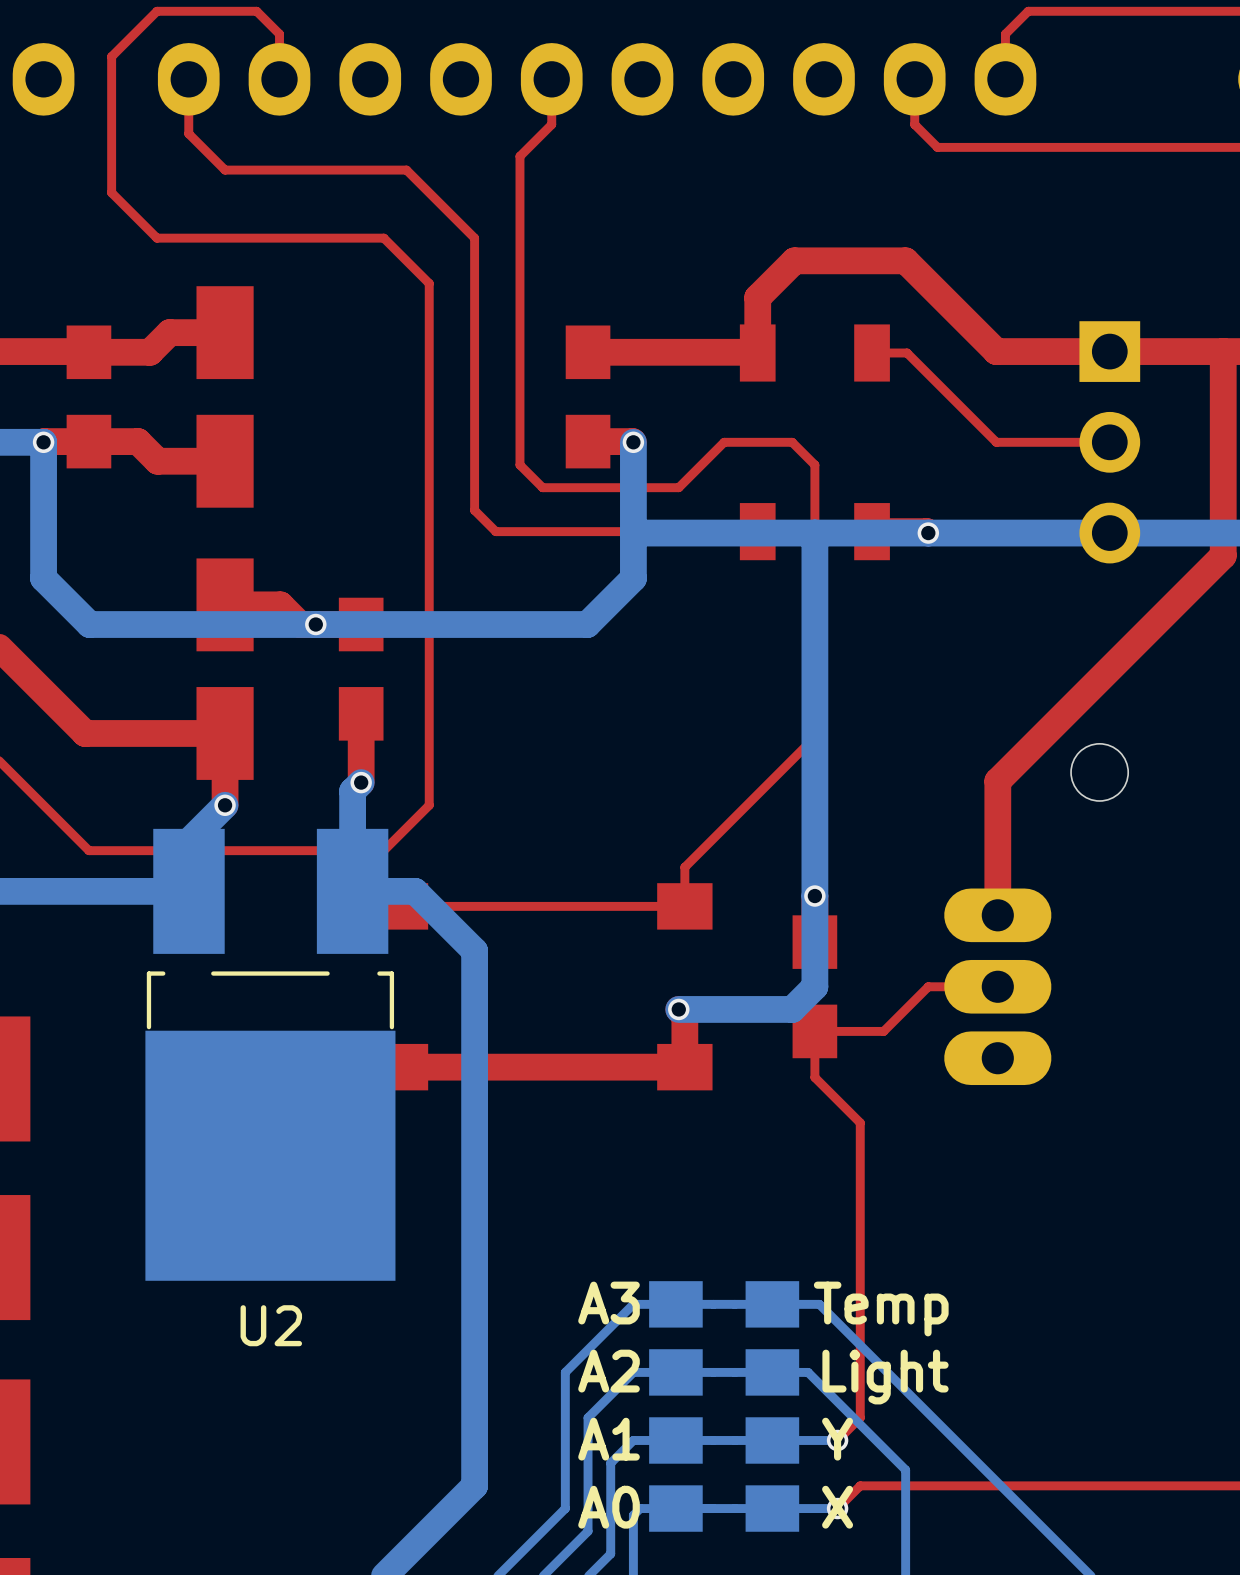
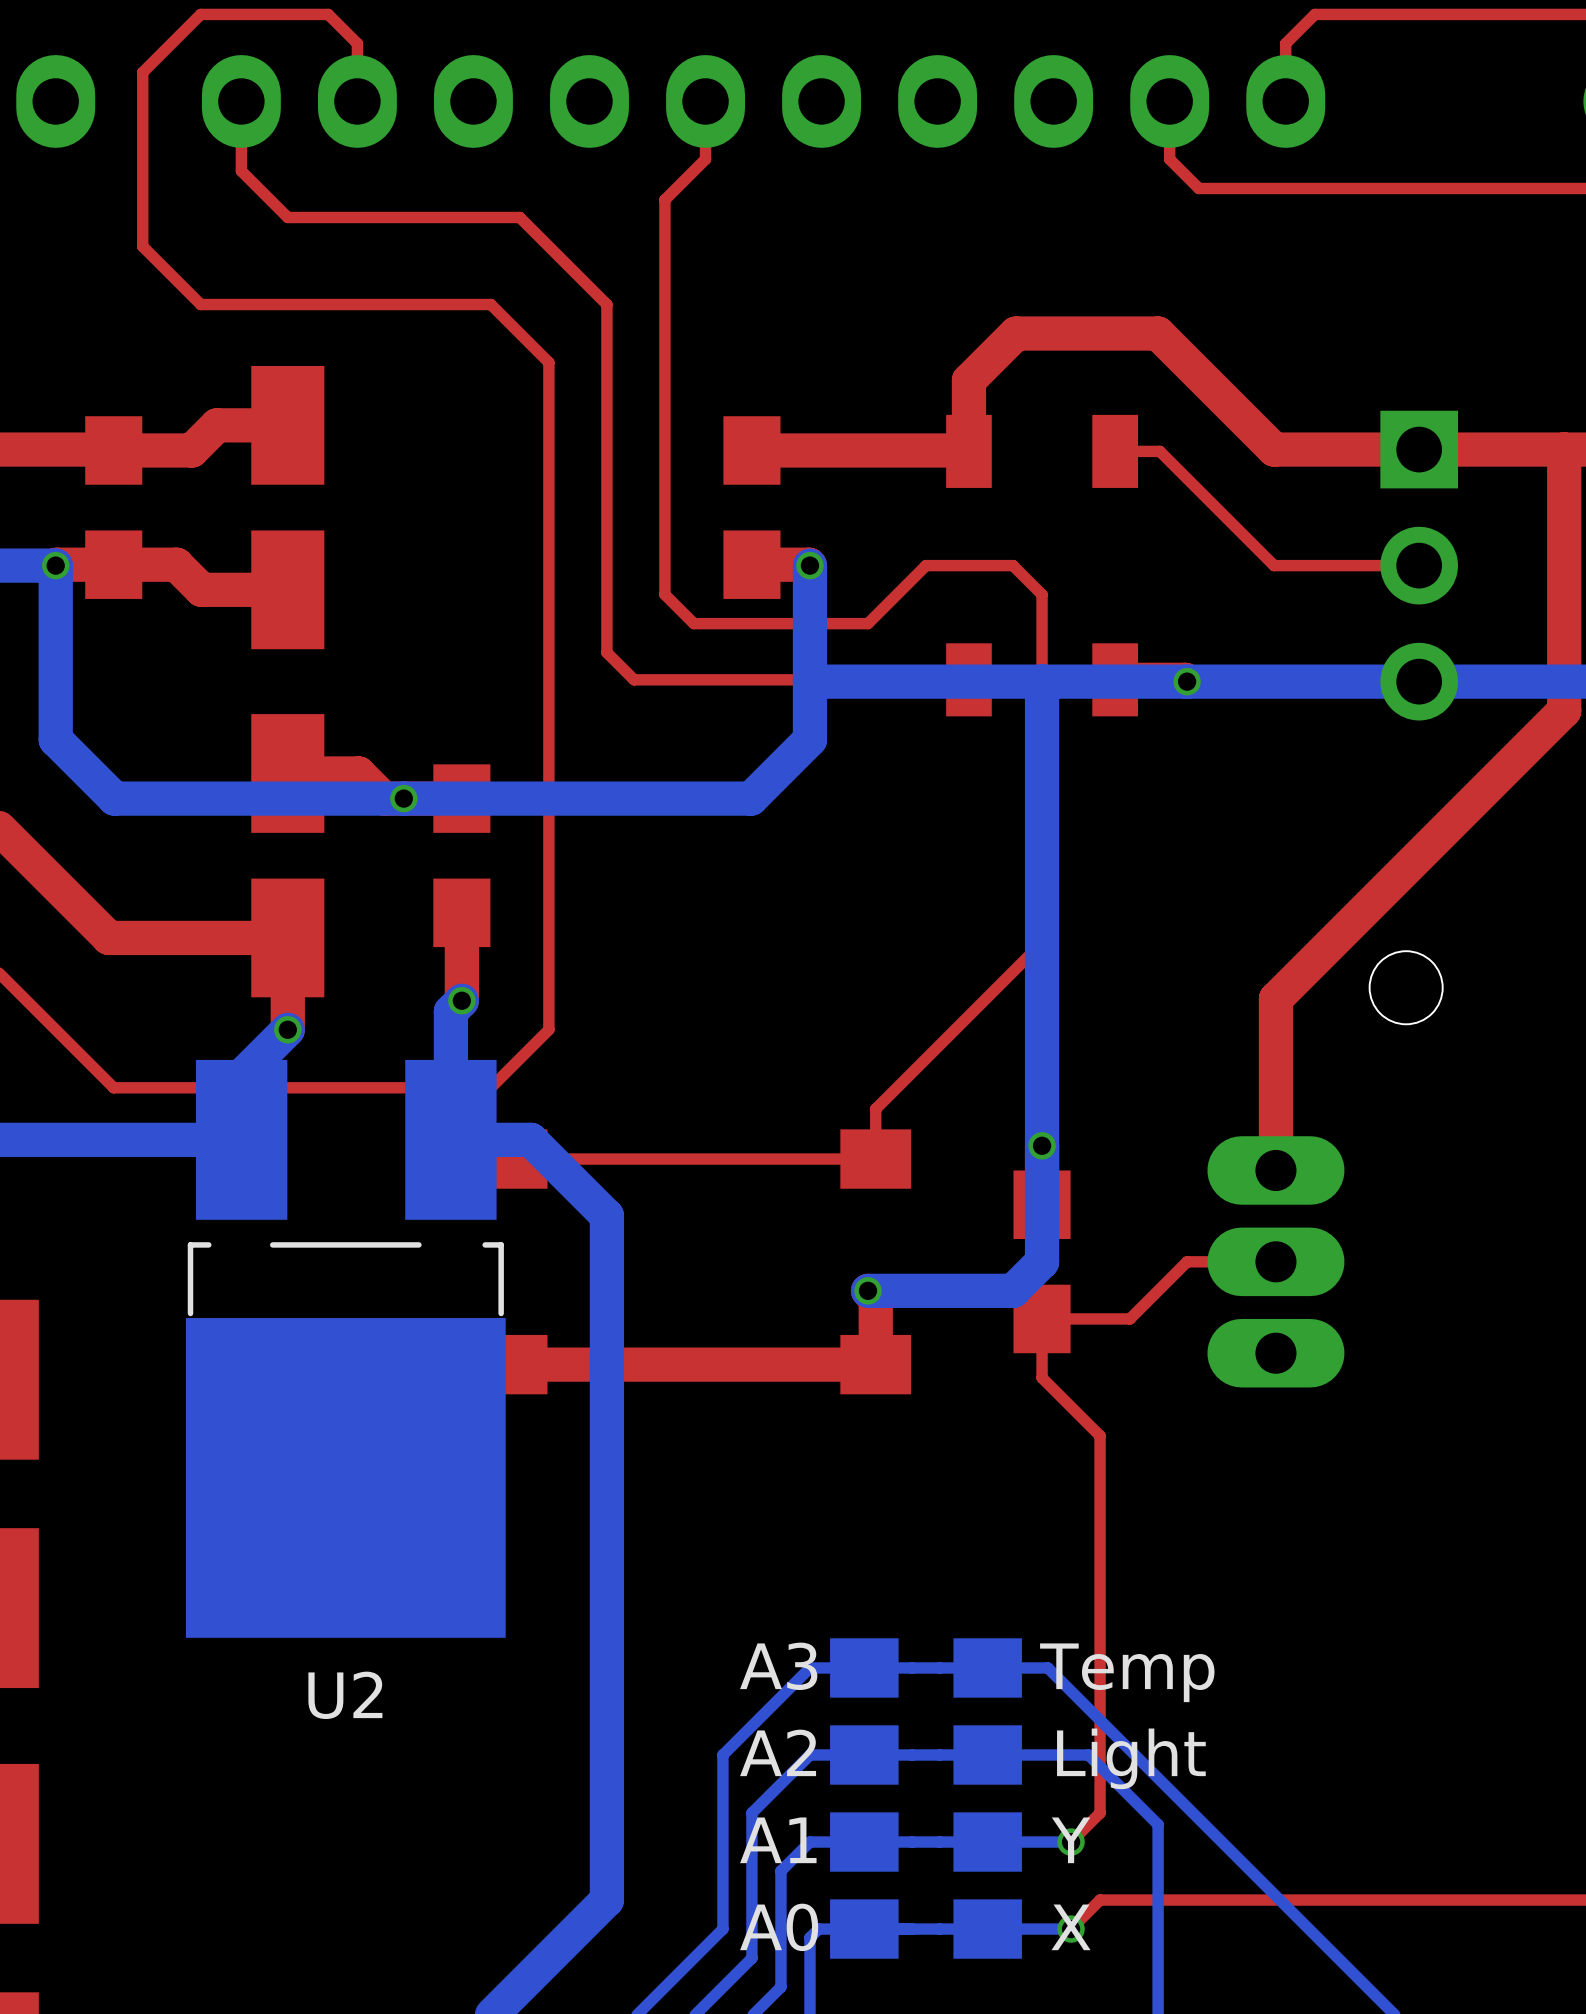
bottom track: (808, 1372) (905, 1469) -> (1033, 1755) (1088, 1755) (1158, 1824) (1158, 1879)

